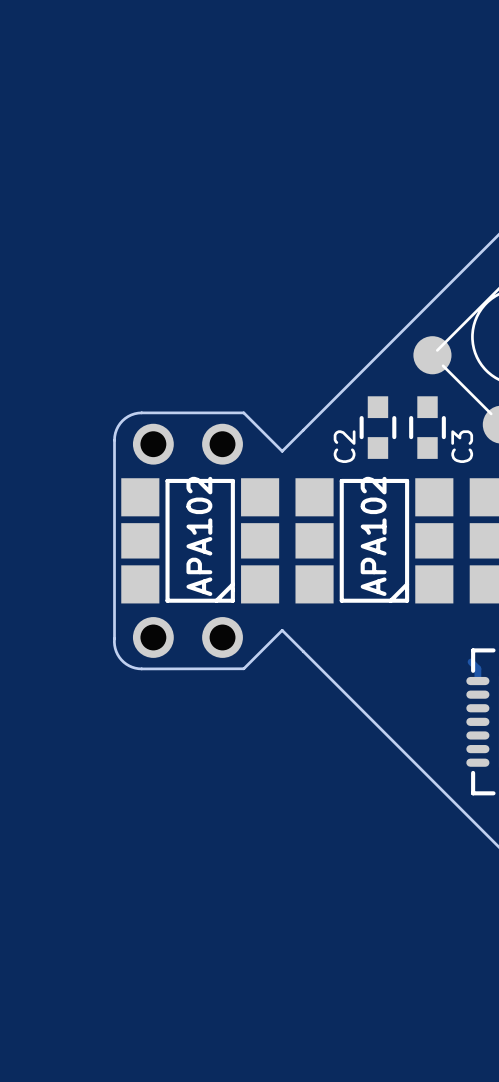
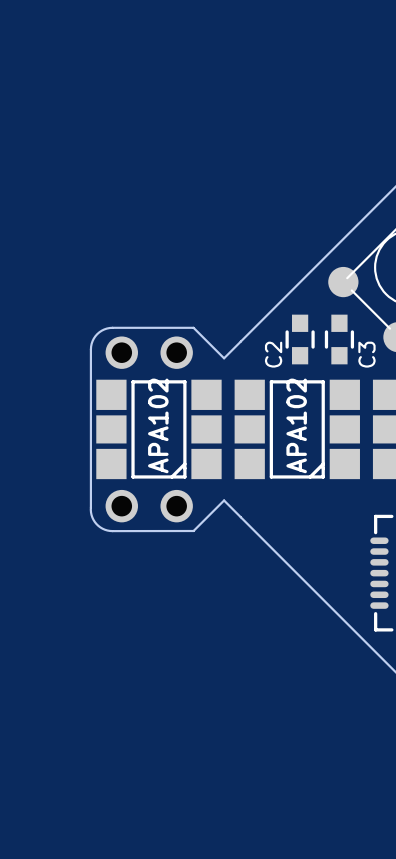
track: (471, 661) (477, 668) (477, 681) -> none

